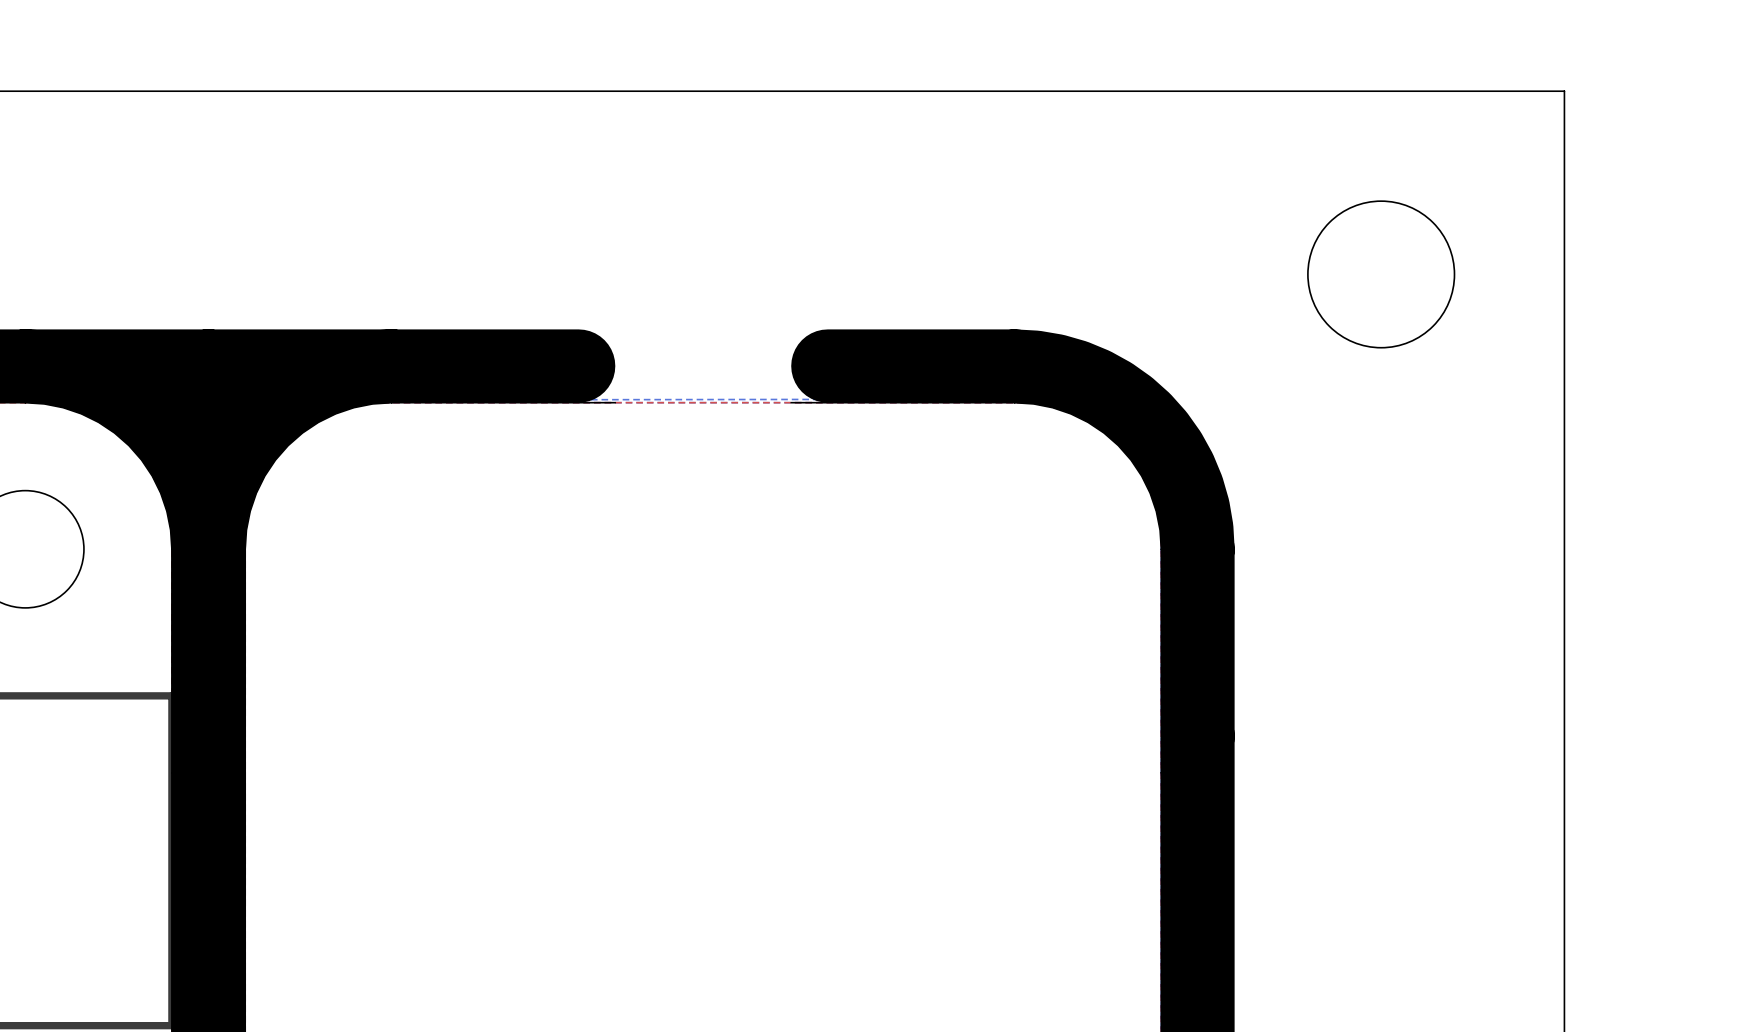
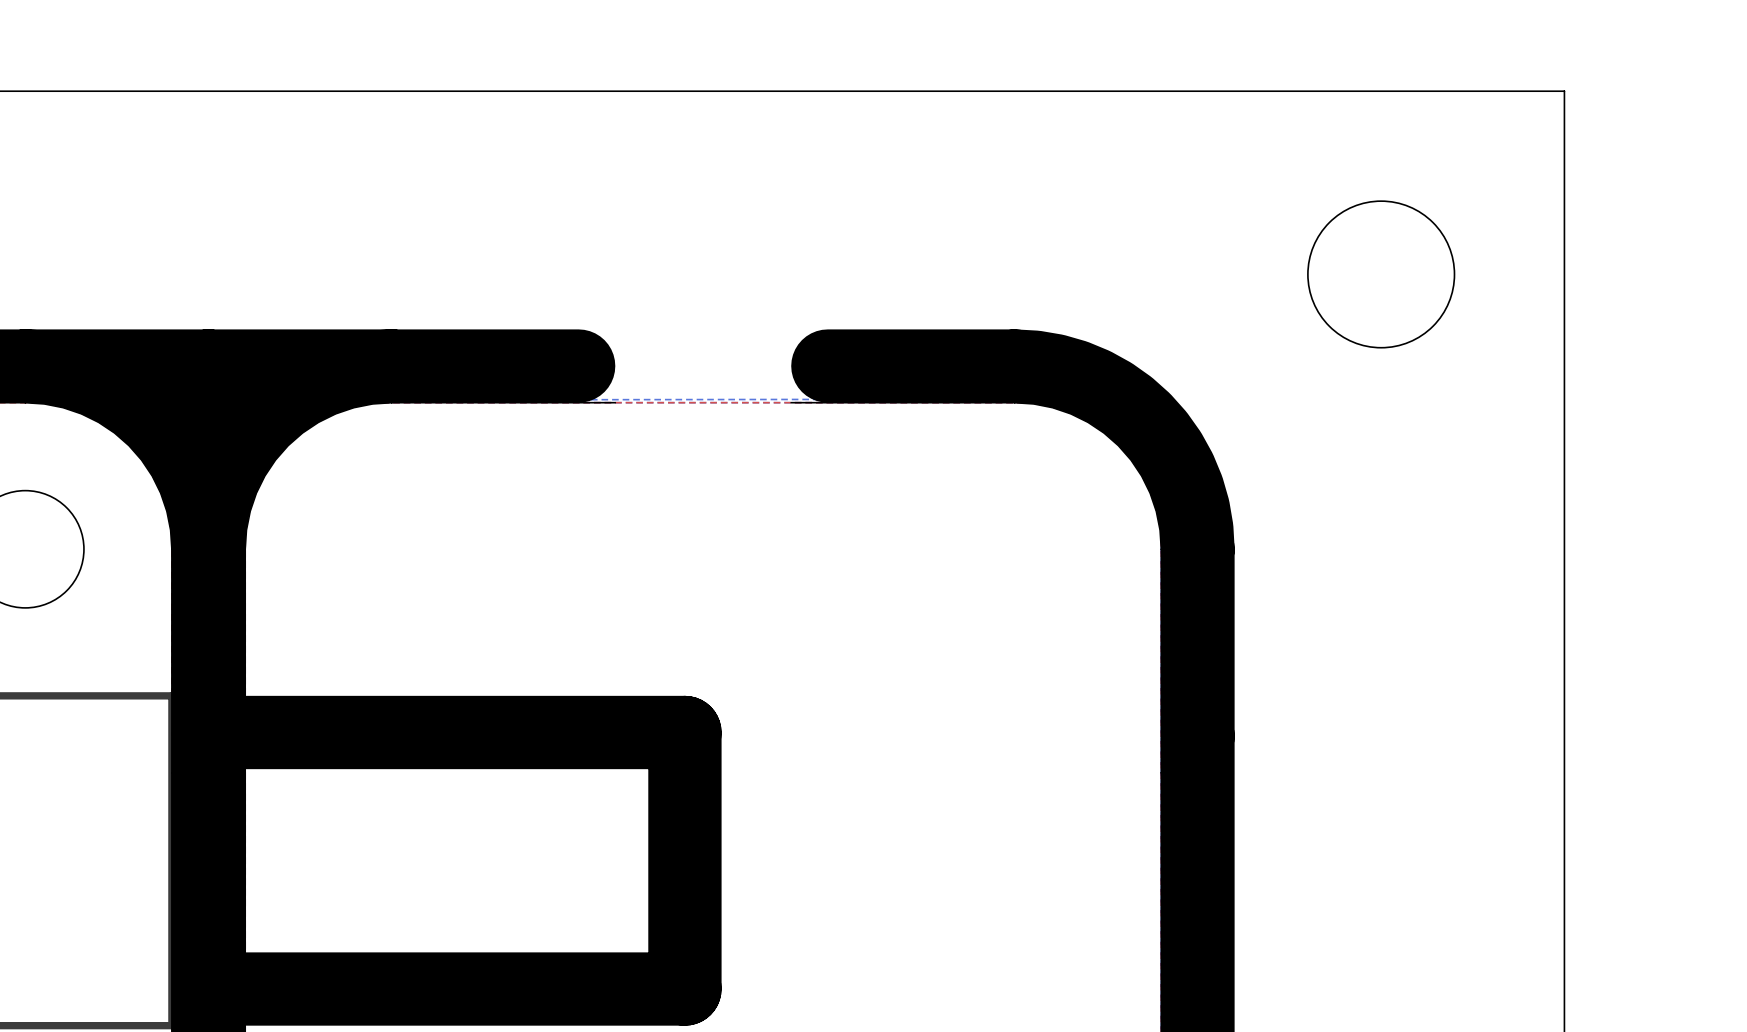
board edge: none -> (208, 736) (208, 732) (684, 732) (684, 989) (208, 989)

